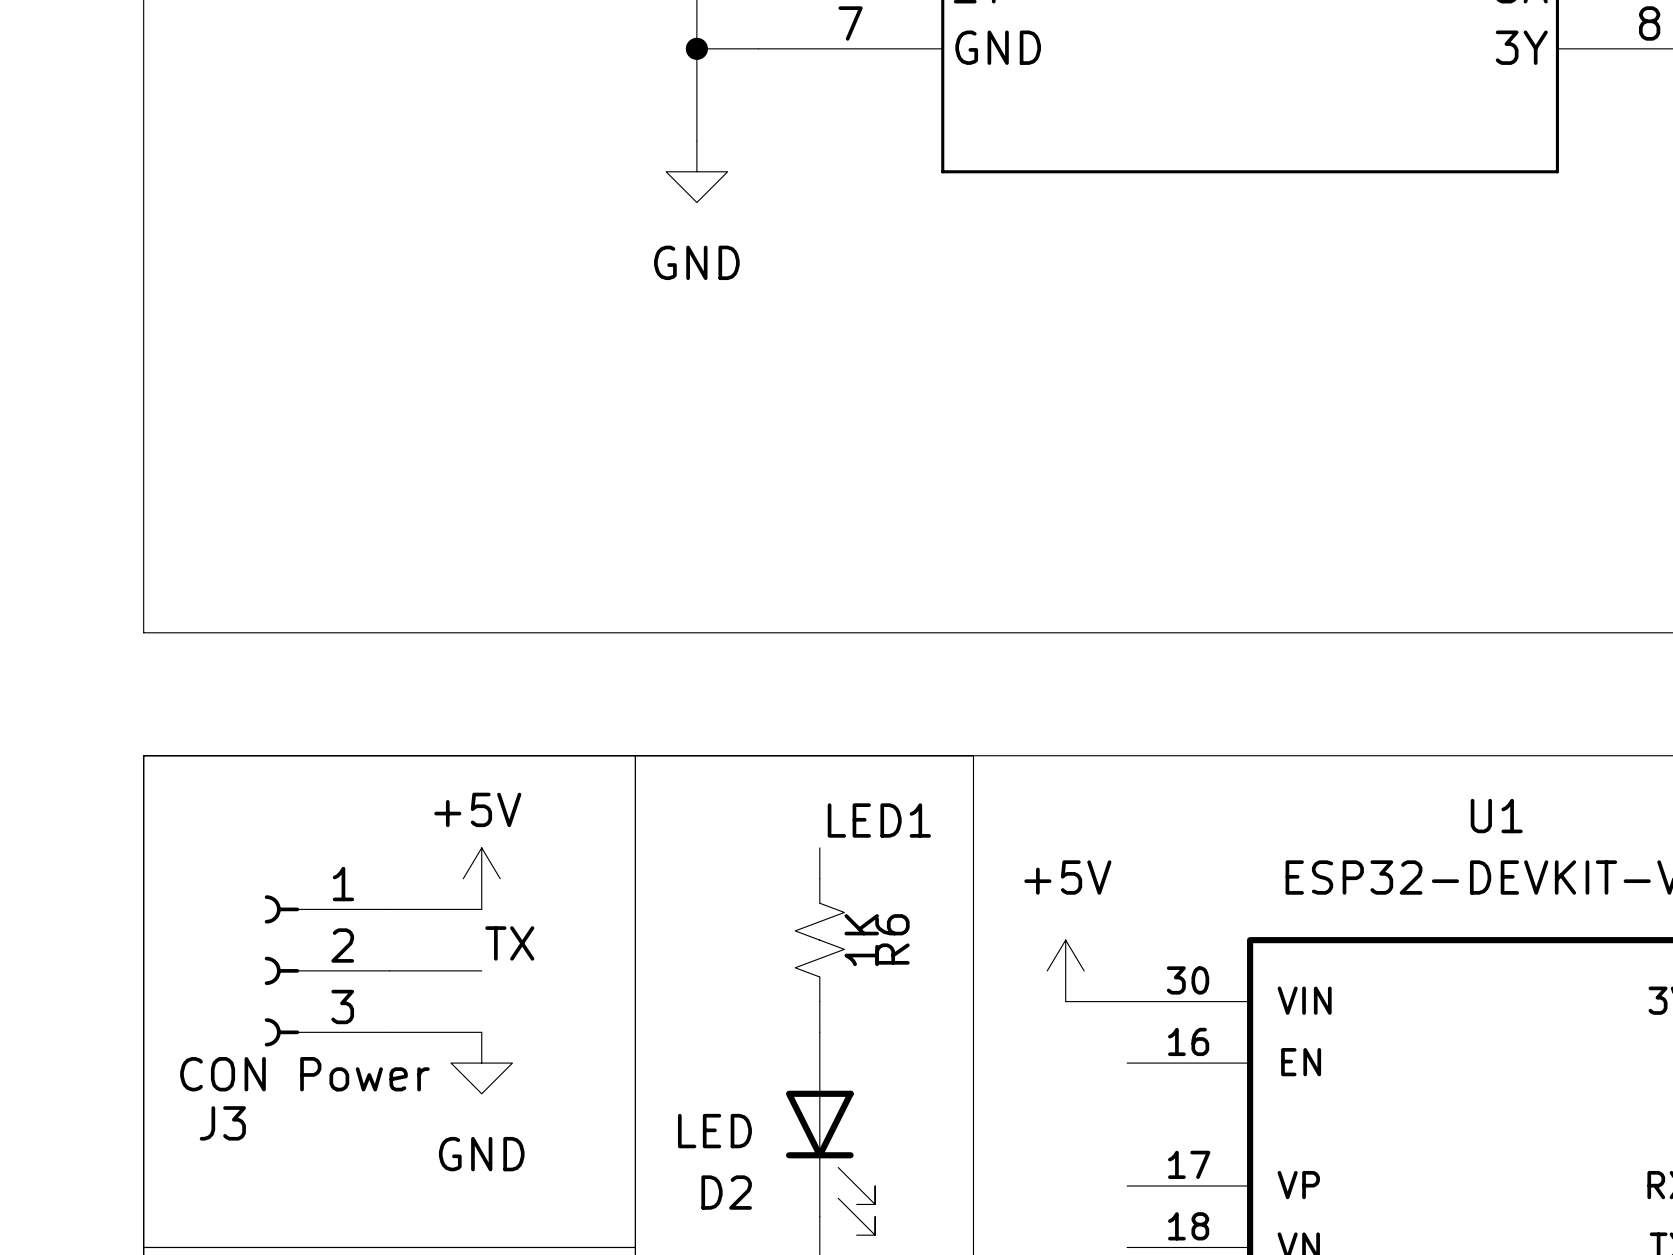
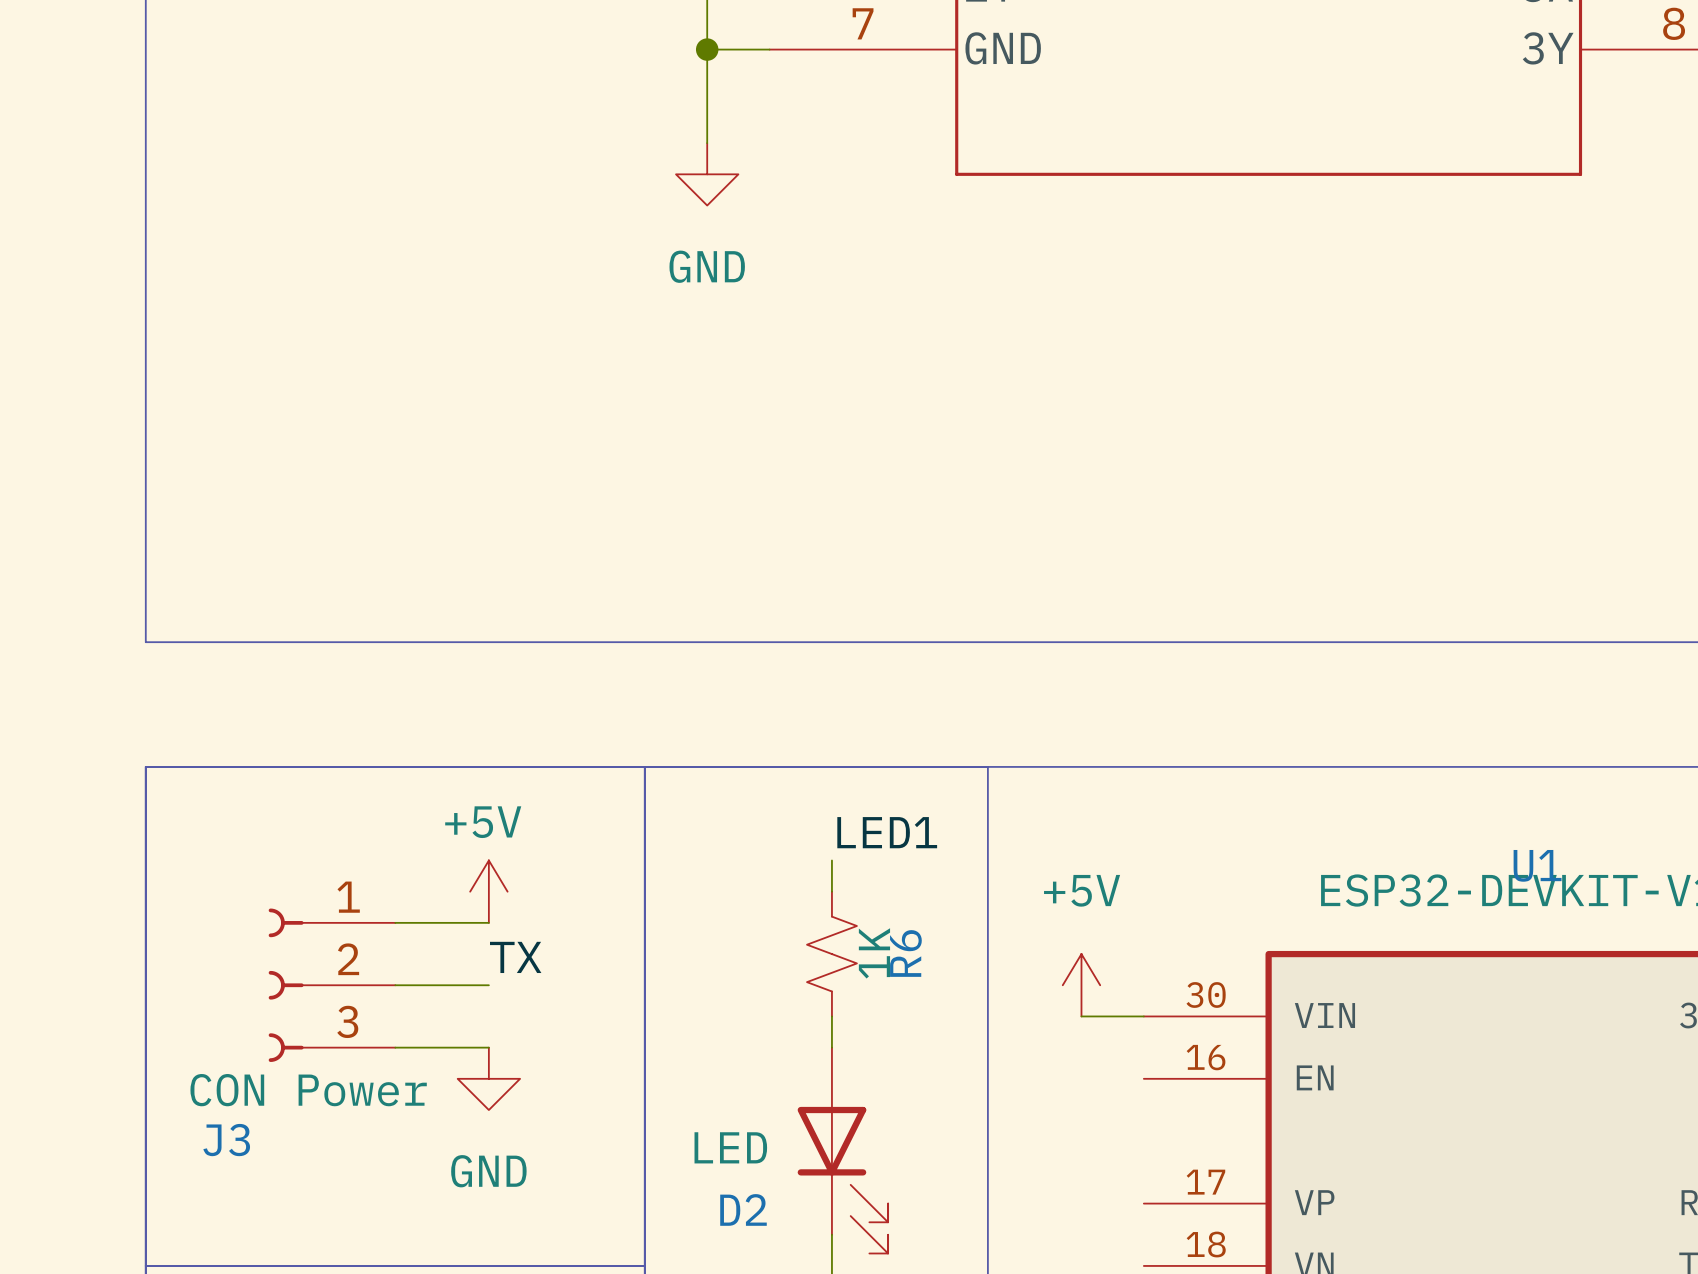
U1 name position: U1 (1496, 816) -> U1 (1537, 865)

